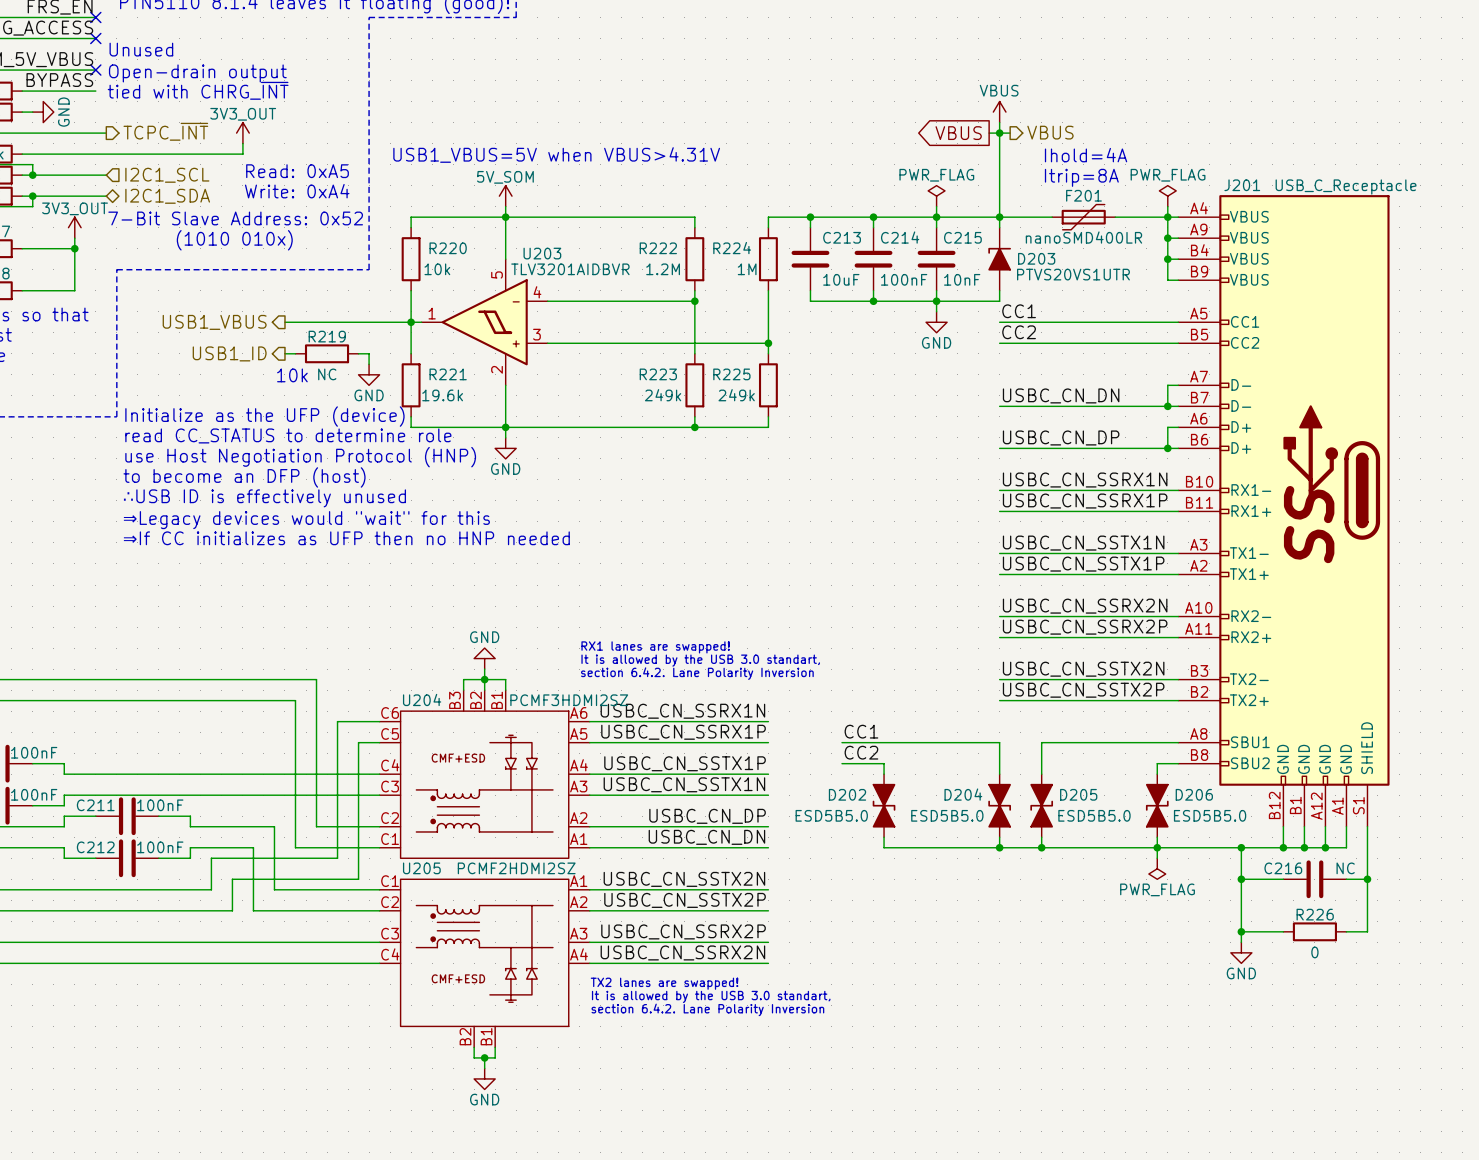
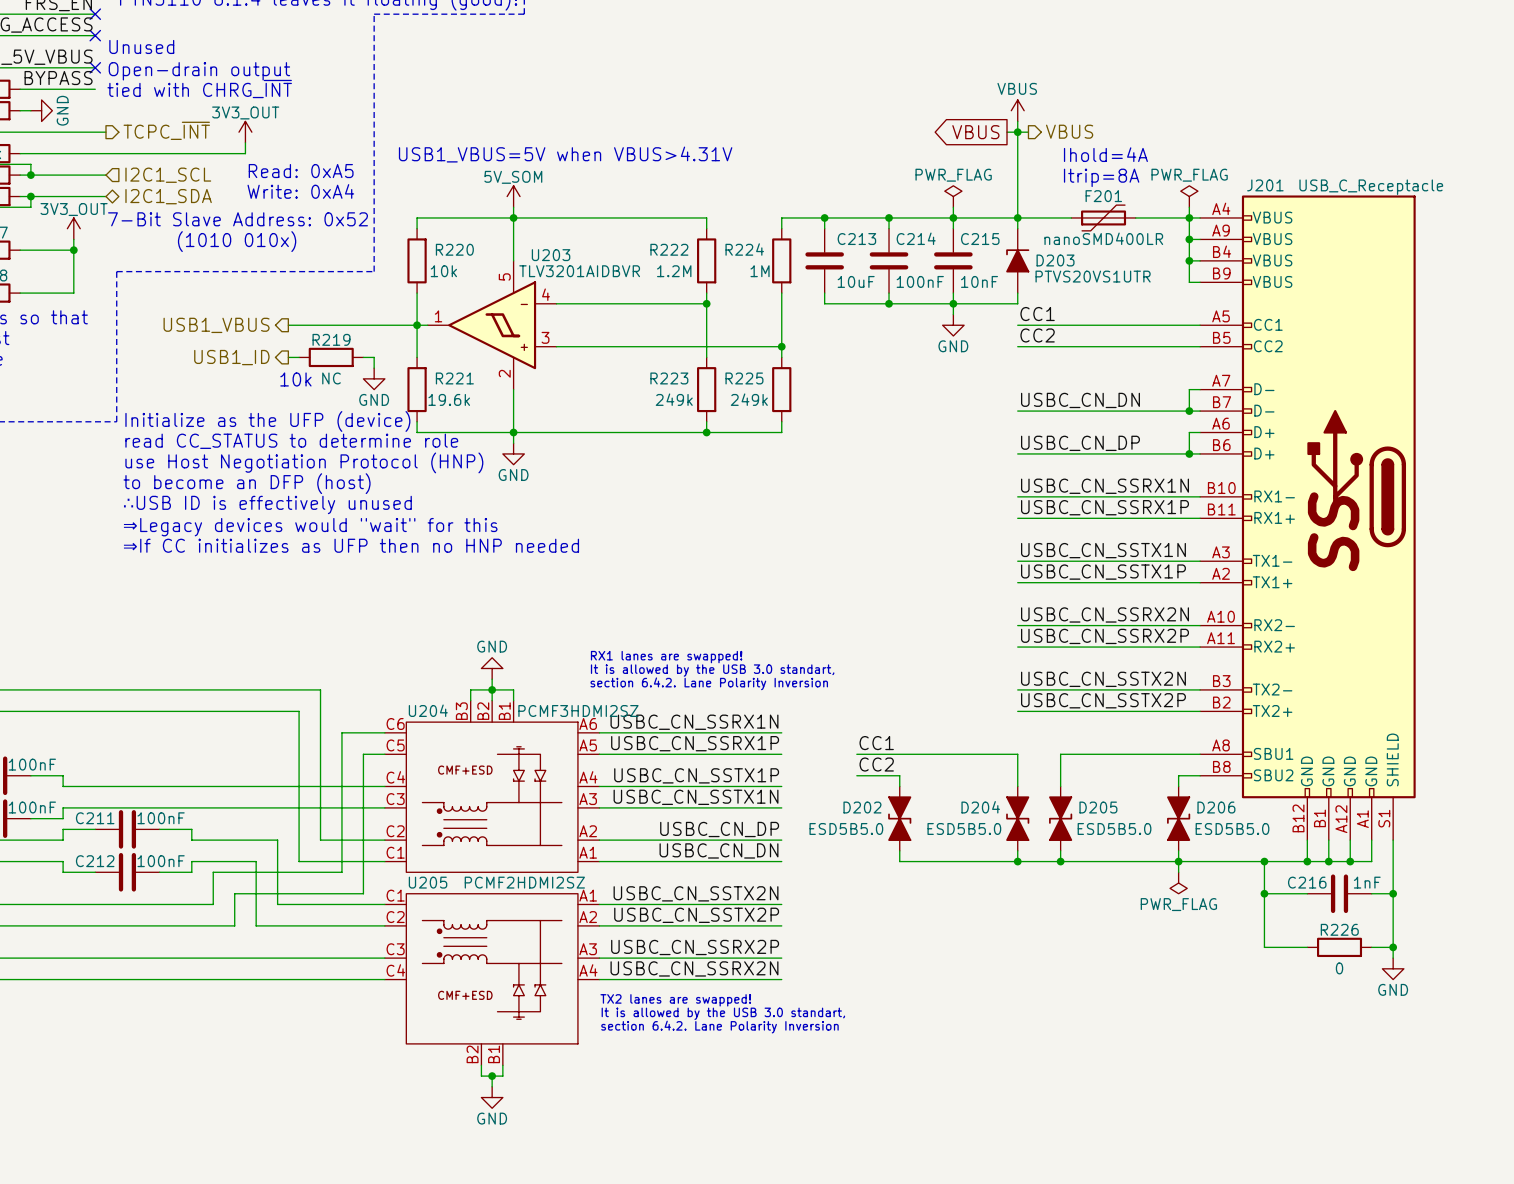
C216 value: NC (1345, 868) -> 1nF (1367, 882)
wire: (1241, 931) (1241, 942) -> (1393, 947) (1393, 958)
junction: (1241, 931) -> none
junction: none -> (1393, 947)
power symbol position: GND (1241, 952) -> GND (1393, 968)

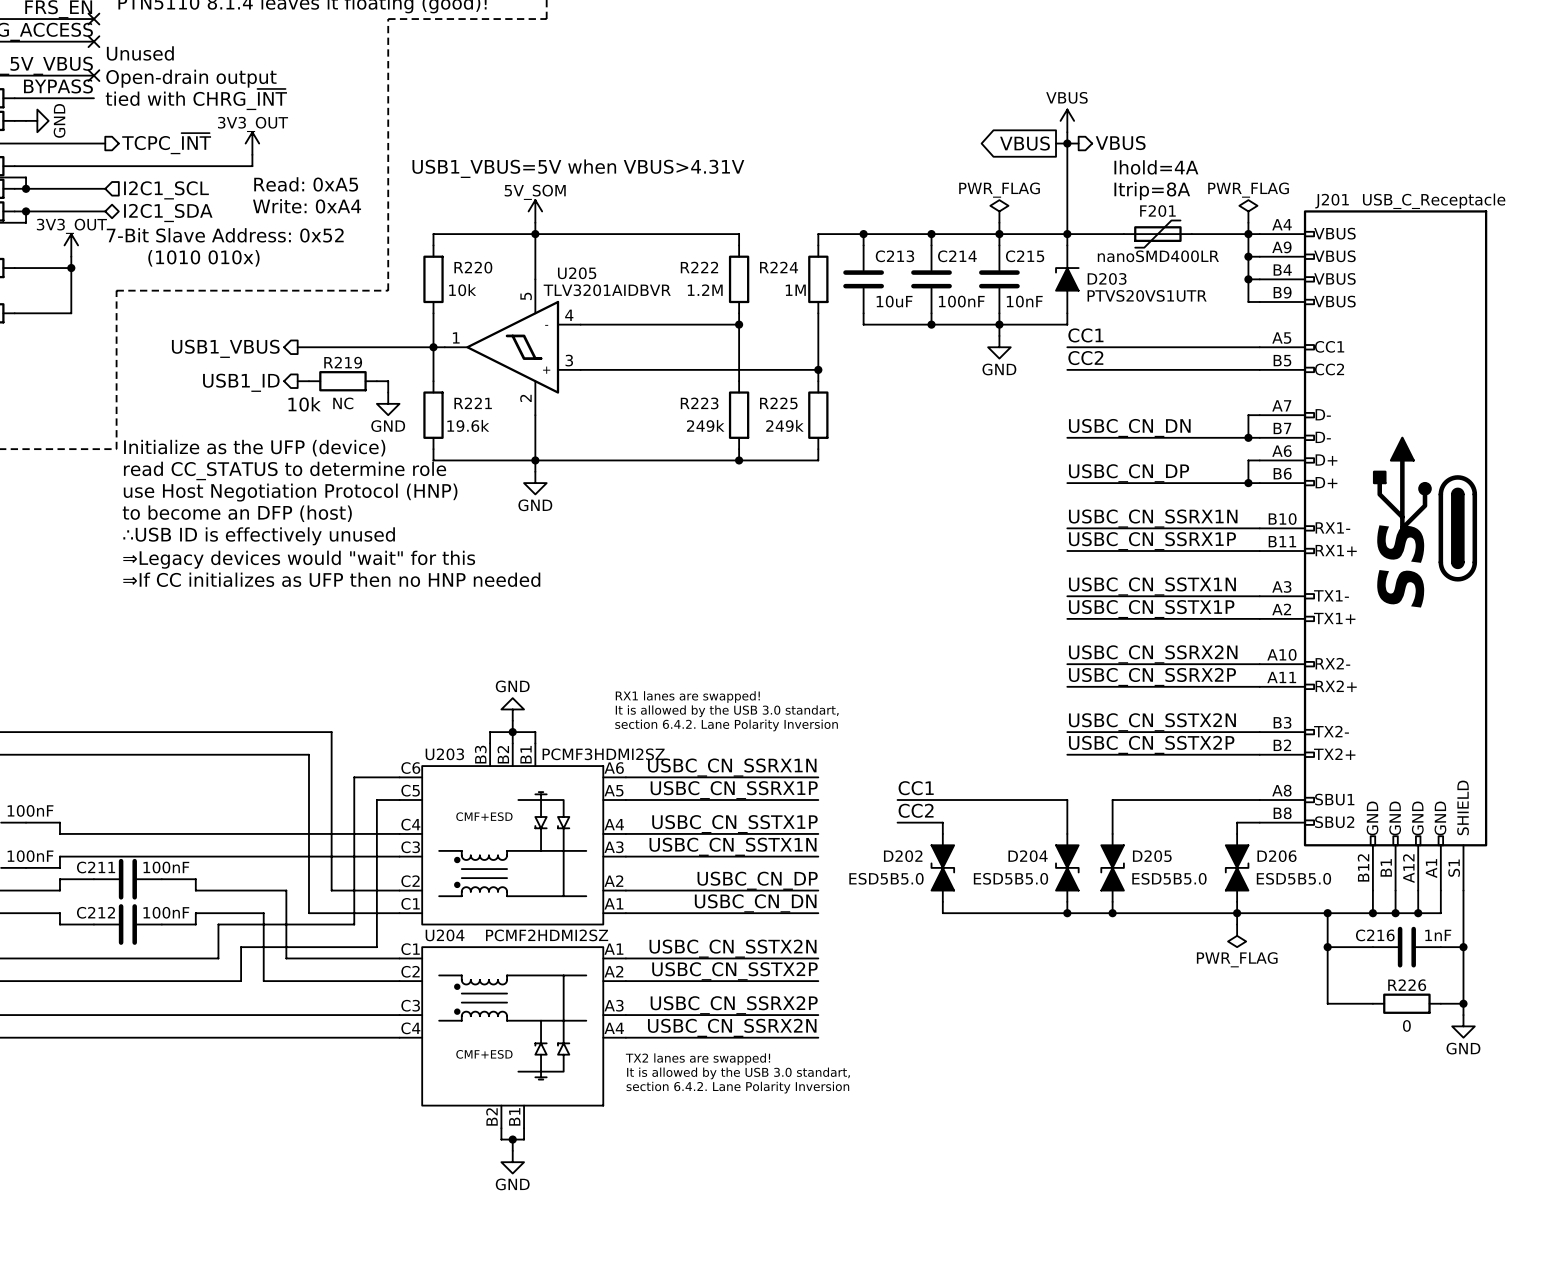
U203 name: U203 (551, 255) -> U205 (577, 273)
U204 name: U204 (428, 710) -> U203 (444, 754)
U205 name: U205 (428, 882) -> U204 (445, 935)

